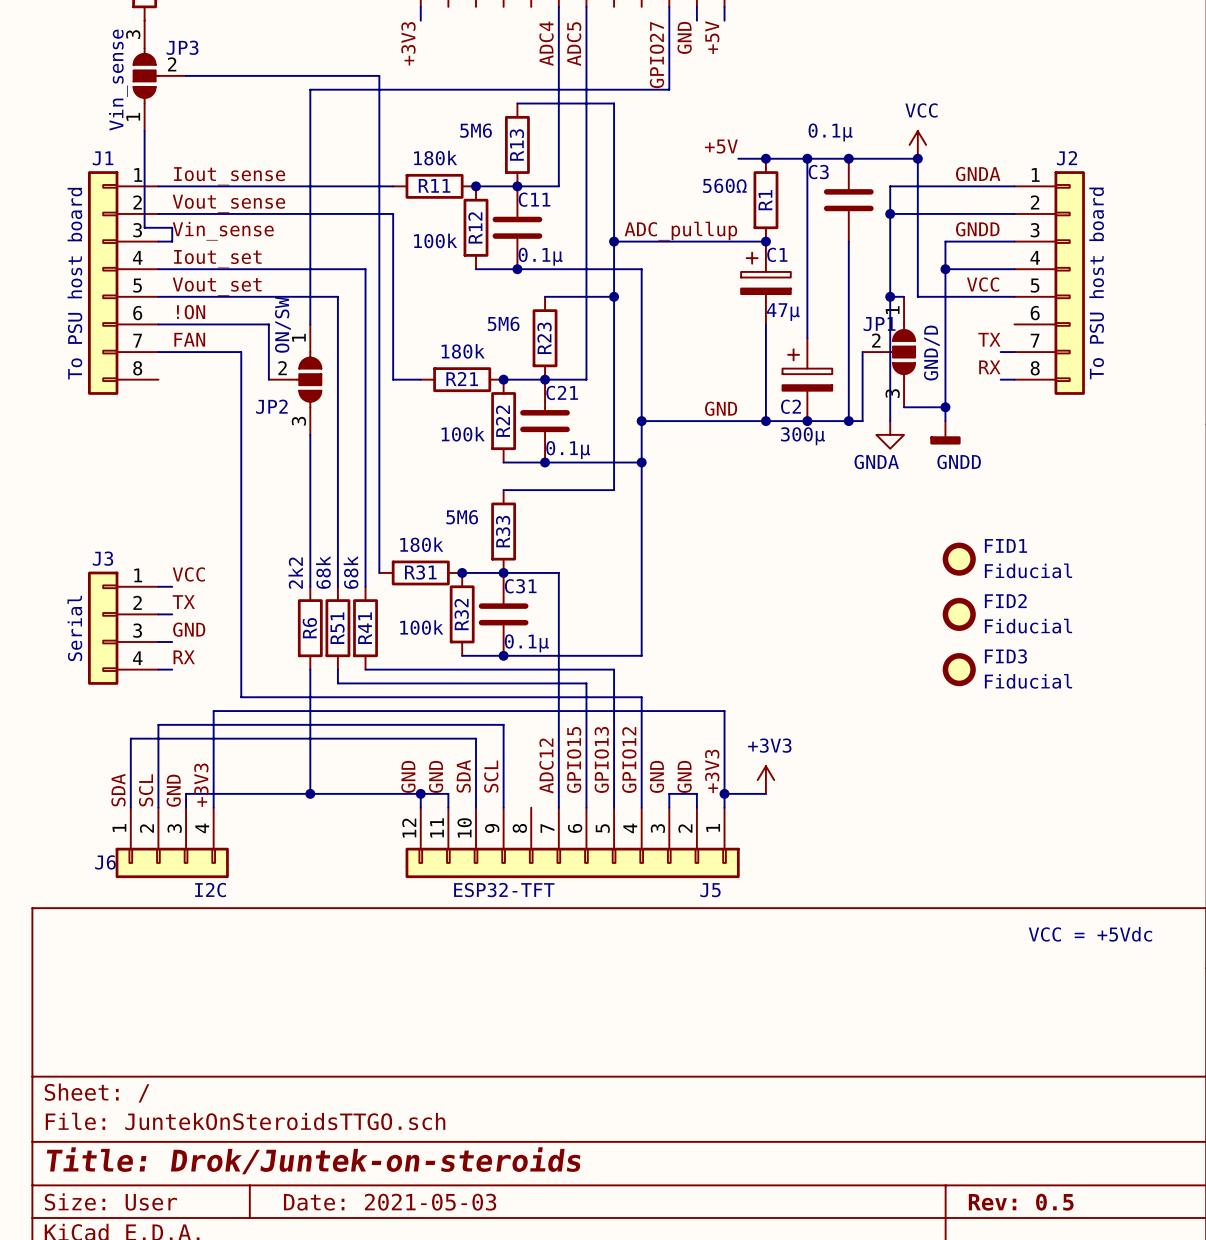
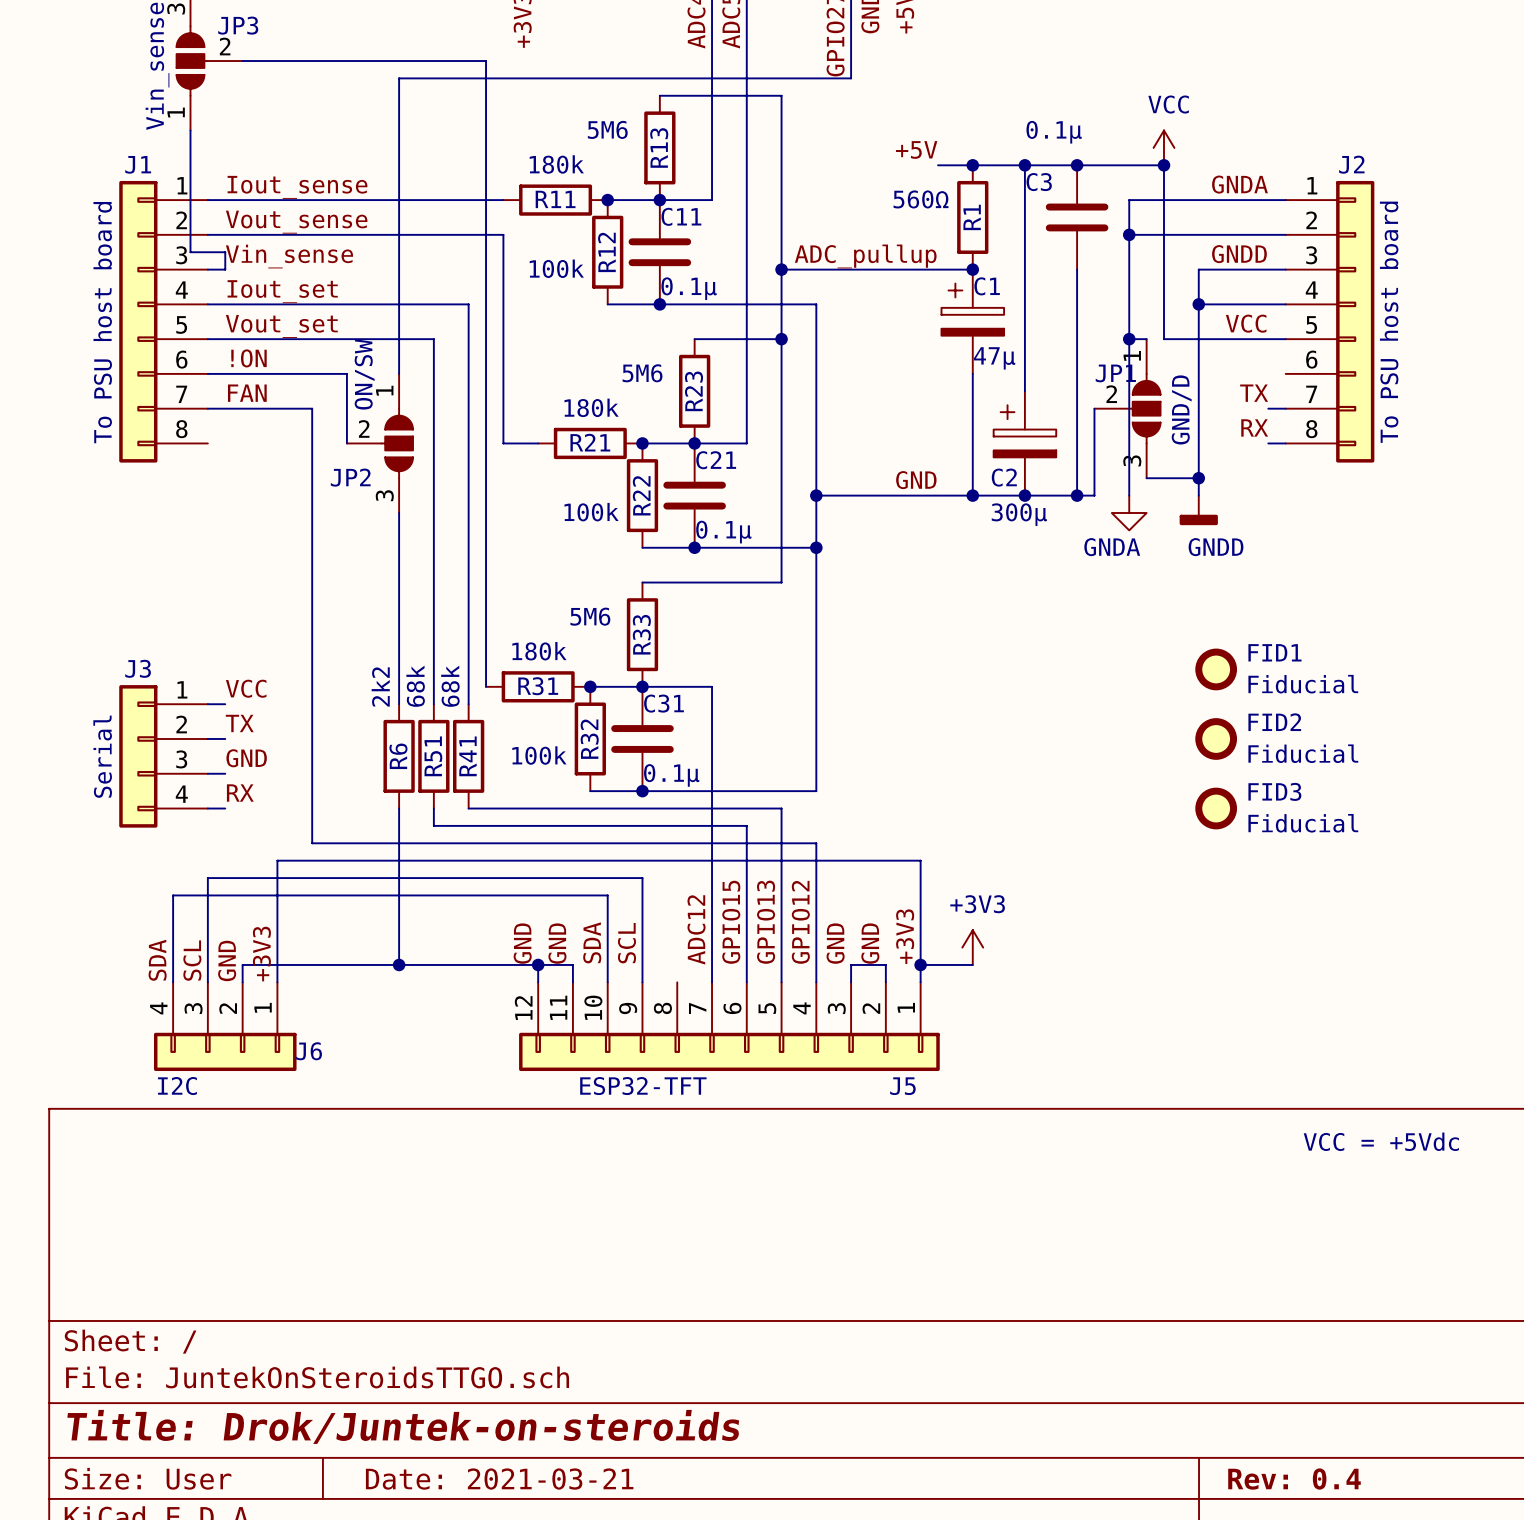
J6 flip: as is (172, 862) -> left-right (225, 1051)
title block: Date: 2021-05-03 (390, 1202) -> Date: 2021-03-21 (499, 1479)
title block: Rev: 0.5 (1021, 1202) -> Rev: 0.4 (1294, 1479)

